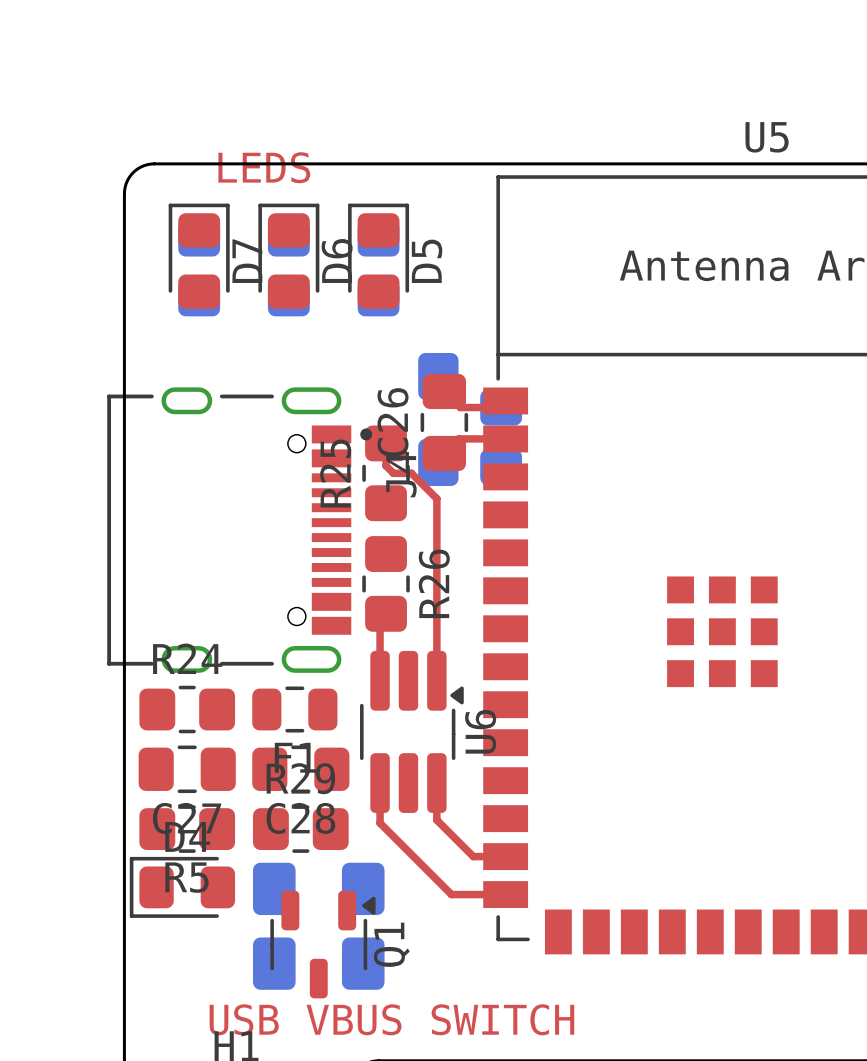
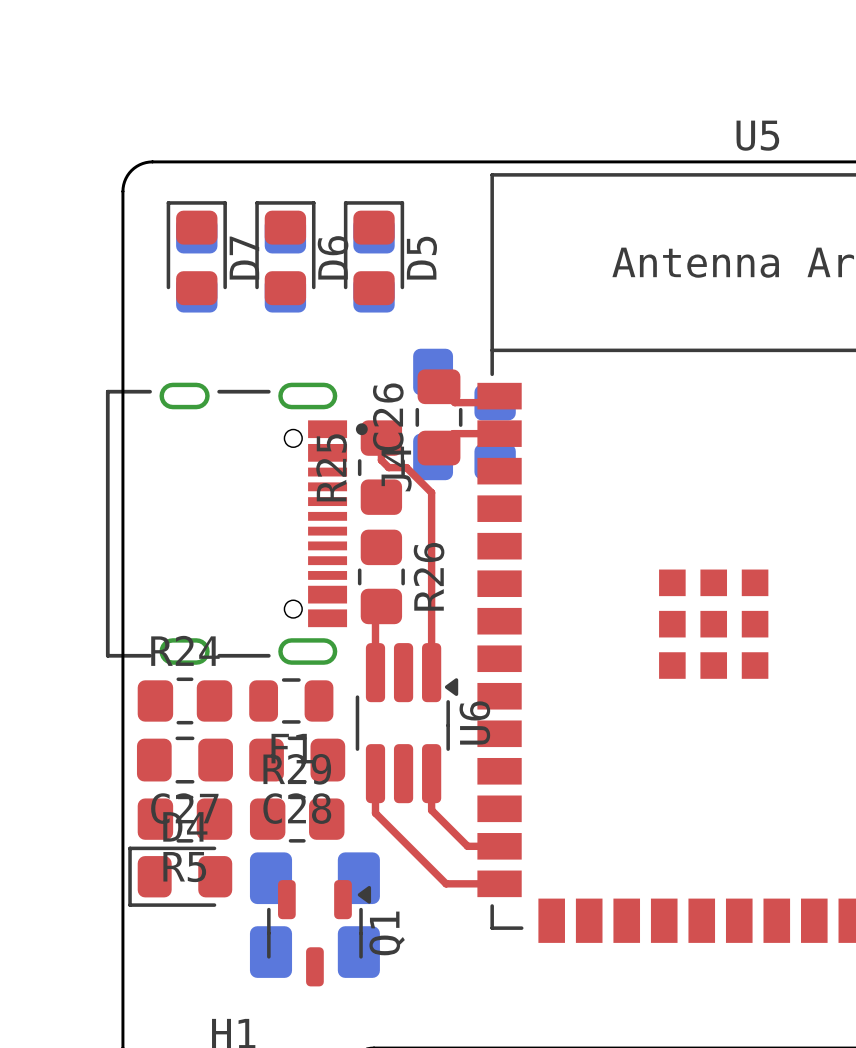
text: LEDS (264, 167) -> none
text: USB VBUS SWITCH (391, 1019) -> none

